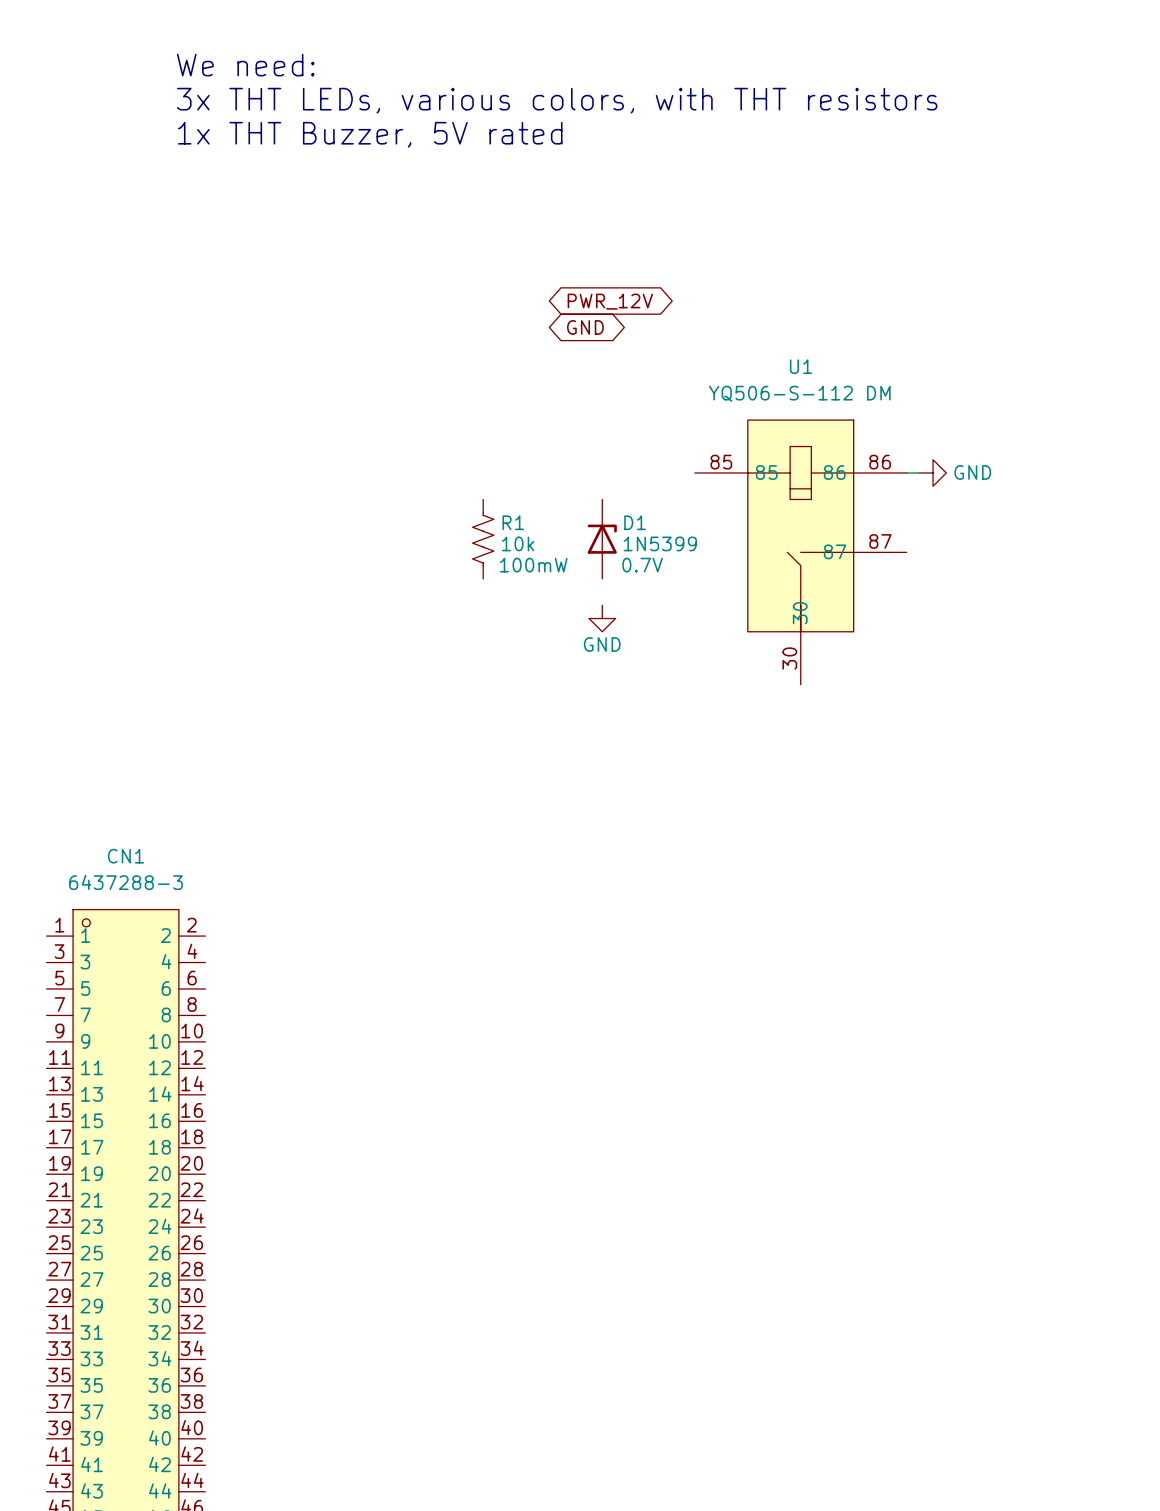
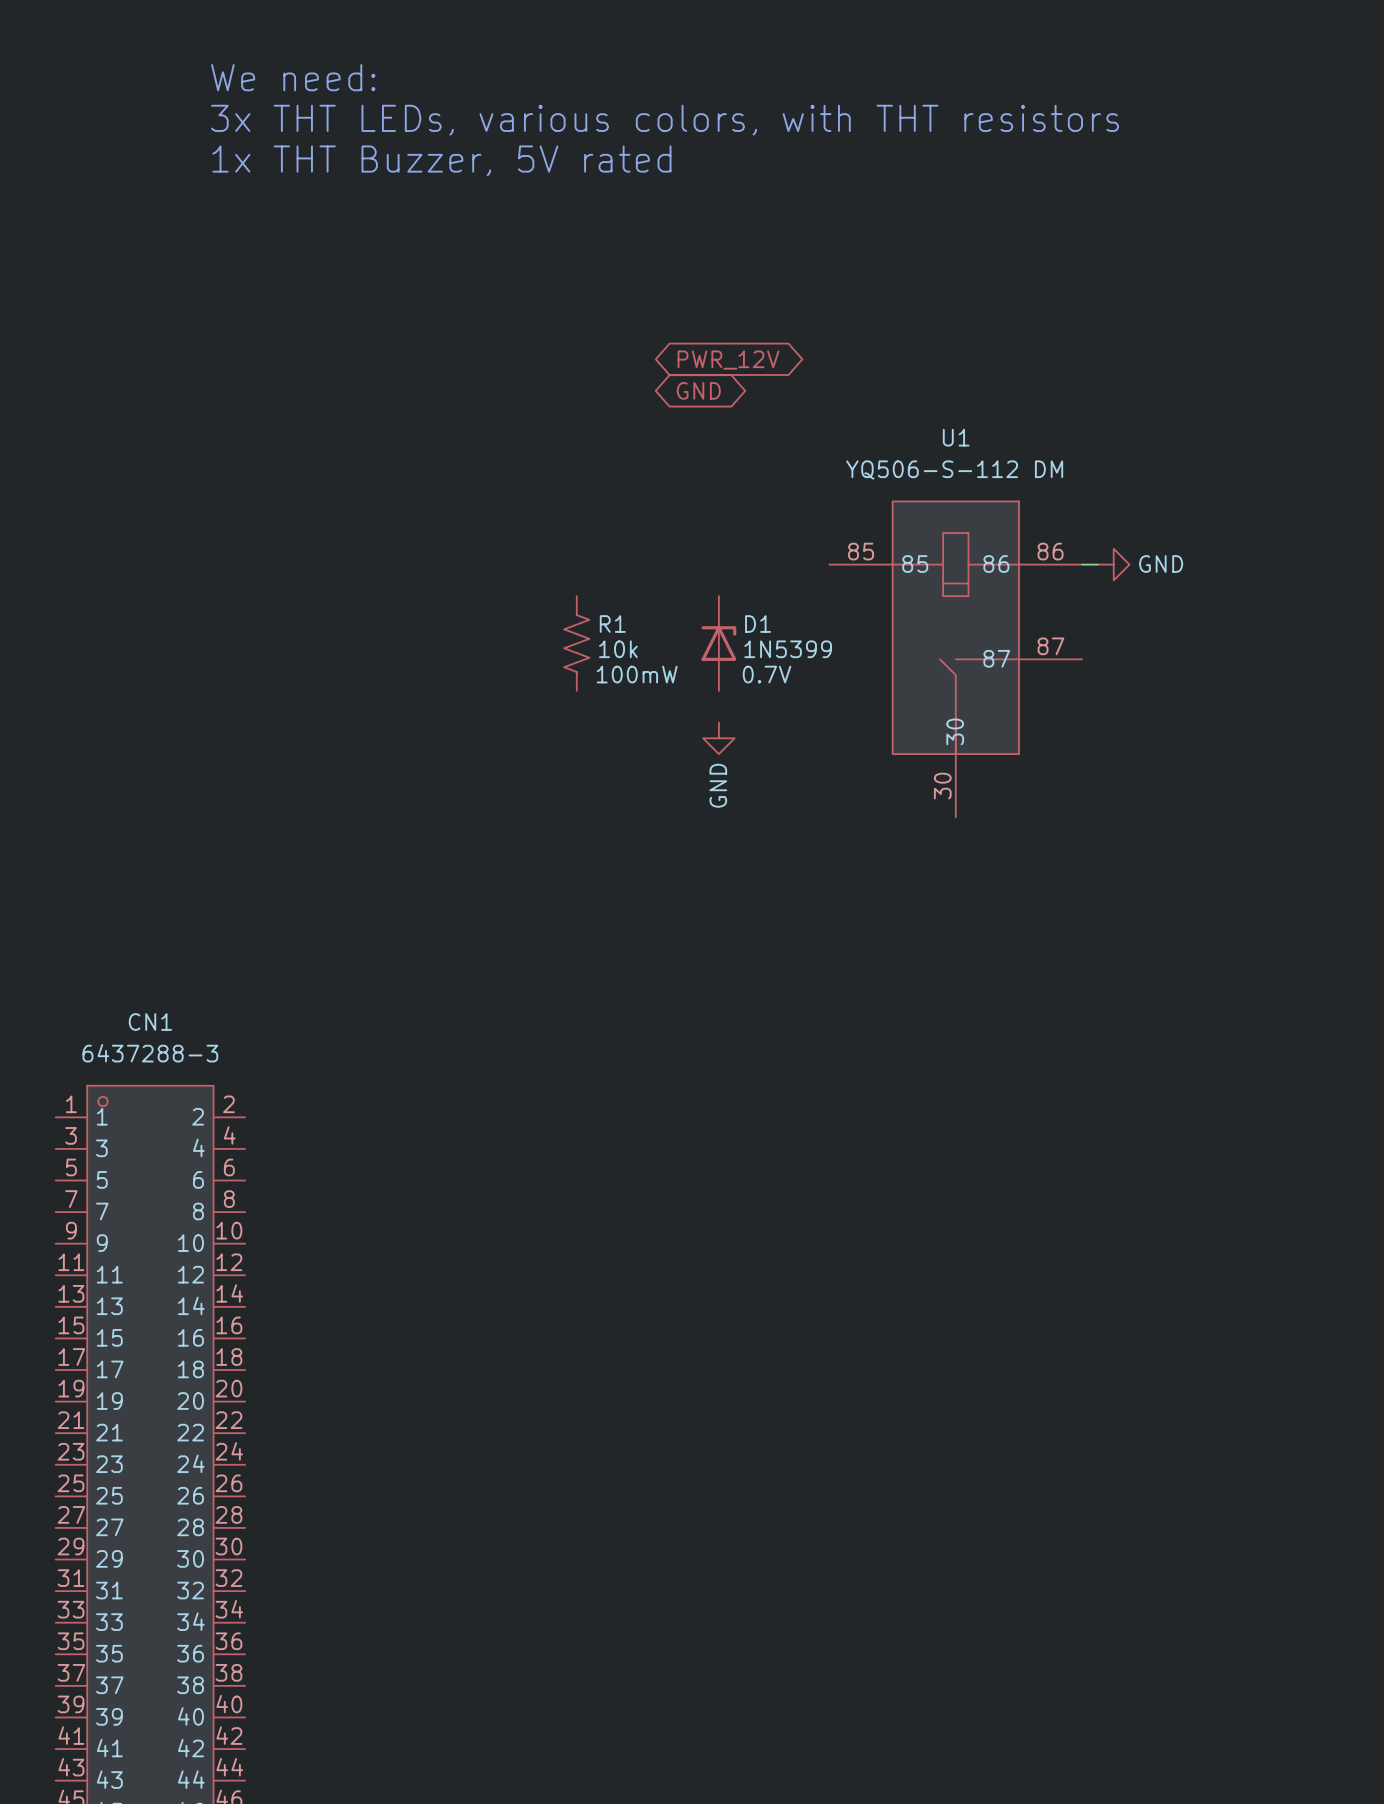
power symbol text rotation: 0° (602, 644) -> 90° counterclockwise (718, 785)

